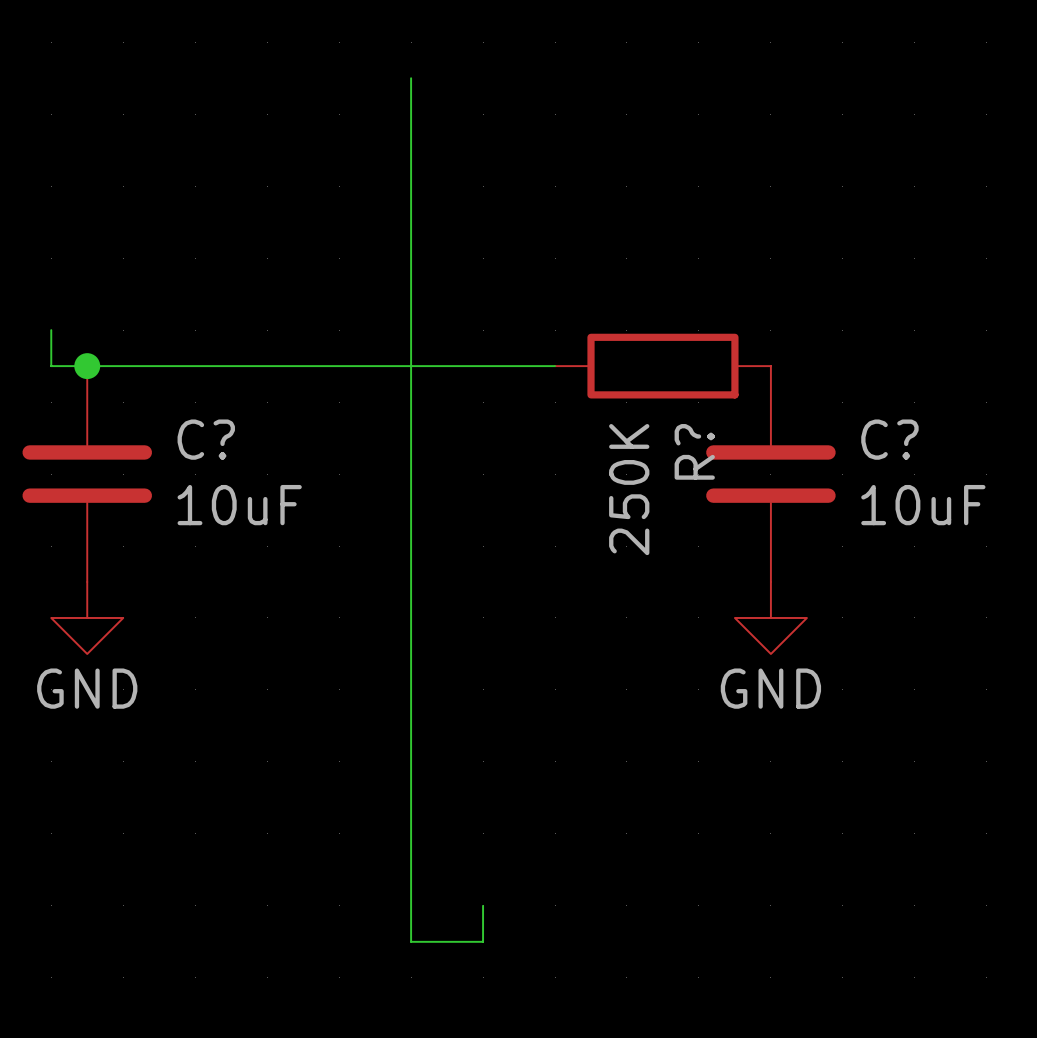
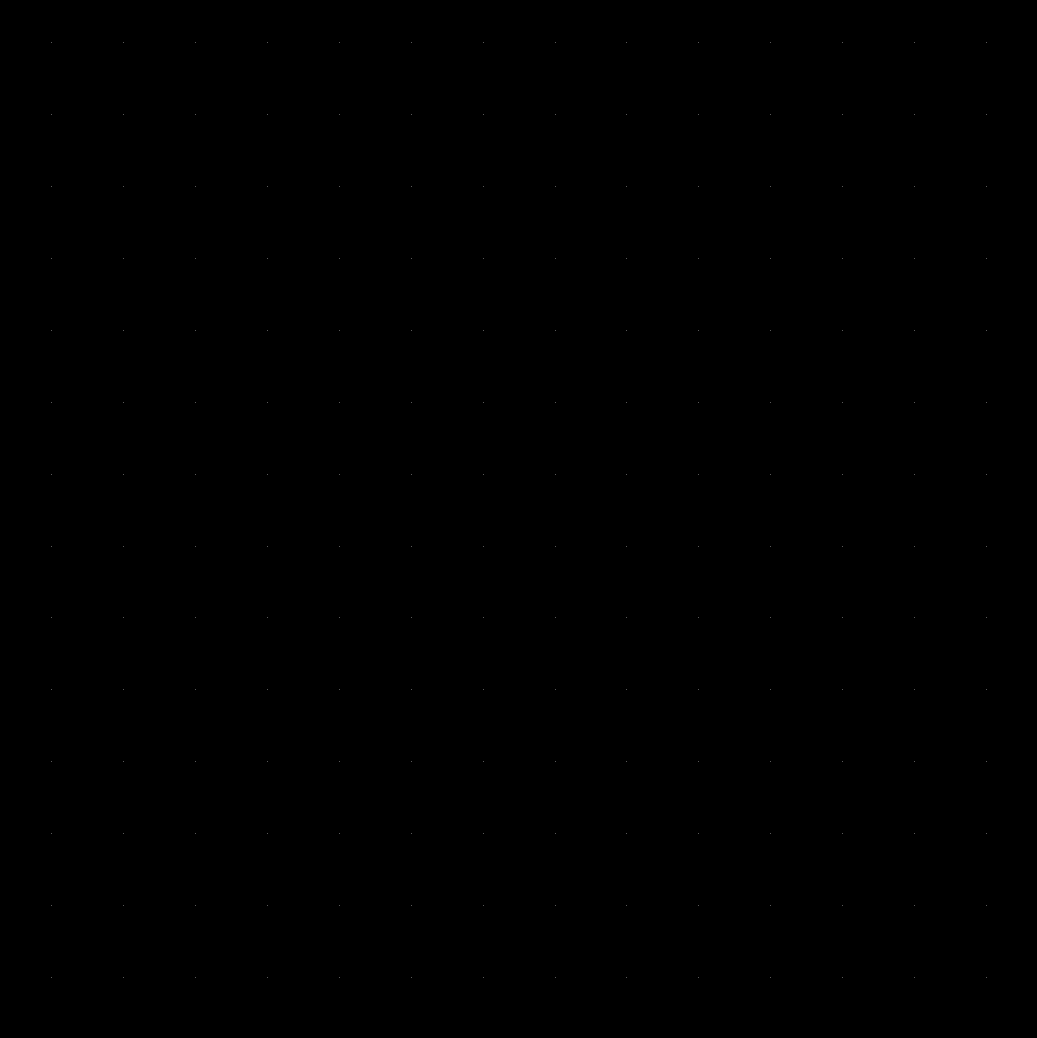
wire: (411, 78) (411, 941) (483, 941) (483, 905) -> none
wire: (51, 330) (51, 366) (555, 366) -> none
junction: (87, 366) -> none
R?: 250K (662, 366) -> none
C?: 10uF (87, 474) -> none
C?: 10uF (770, 474) -> none
power symbol: GND (87, 617) -> none
power symbol: GND (770, 617) -> none

